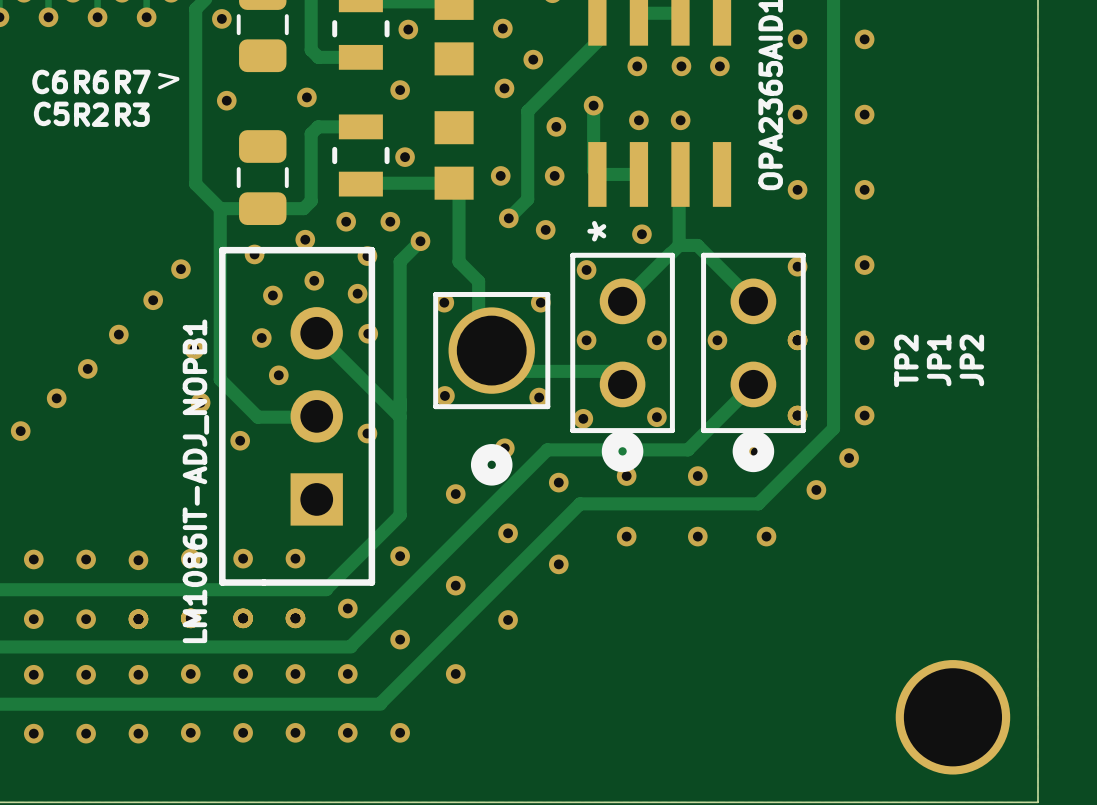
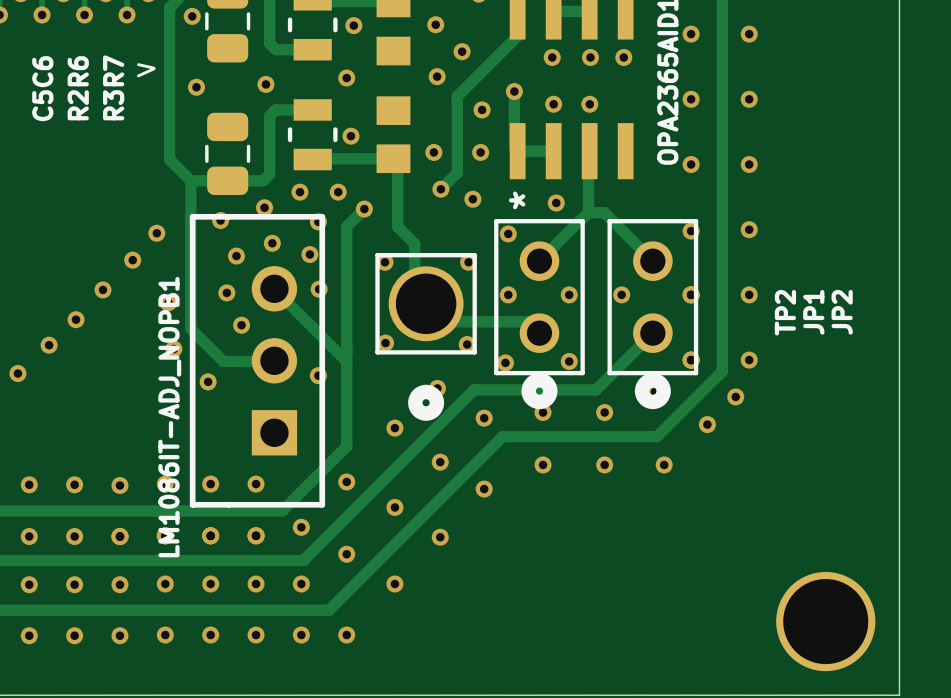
C6 name rotation: 0° (50, 81) -> 90° counterclockwise (42, 71)
R6 name rotation: 0° (91, 81) -> 90° counterclockwise (78, 71)
R7 name rotation: 0° (132, 81) -> 90° counterclockwise (113, 70)
C5 name rotation: 0° (51, 113) -> 90° counterclockwise (42, 105)
R2 name rotation: 0° (91, 114) -> 90° counterclockwise (78, 105)
R3 name rotation: 0° (132, 114) -> 90° counterclockwise (113, 105)

